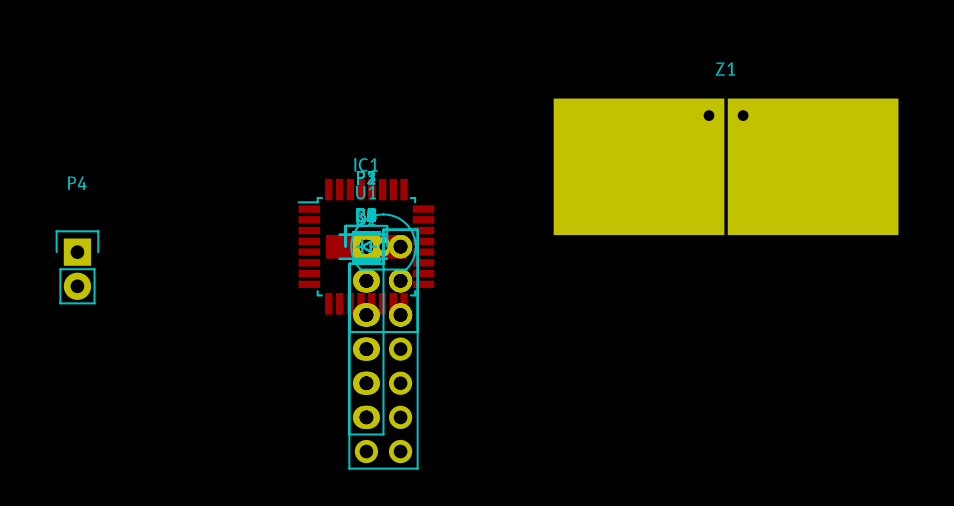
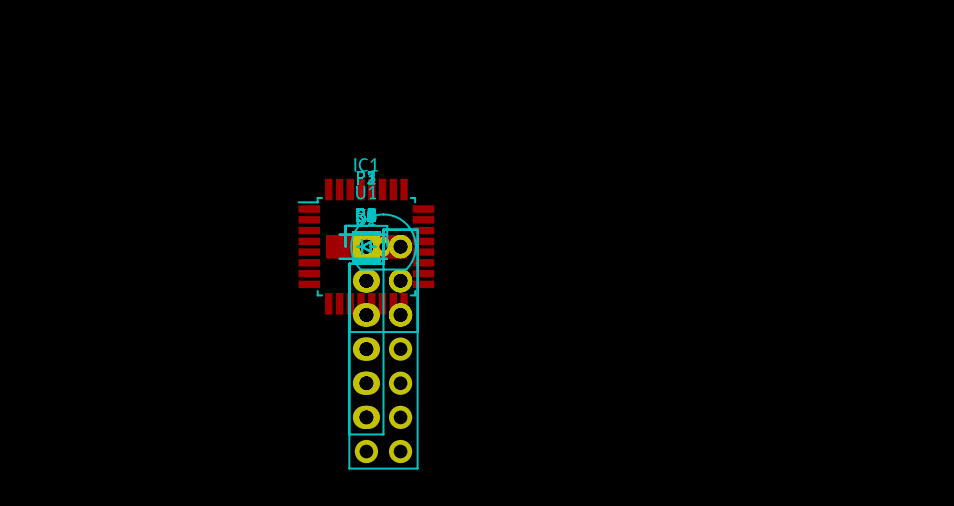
Z1: (726, 166) -> none
P4: (77, 267) -> none

